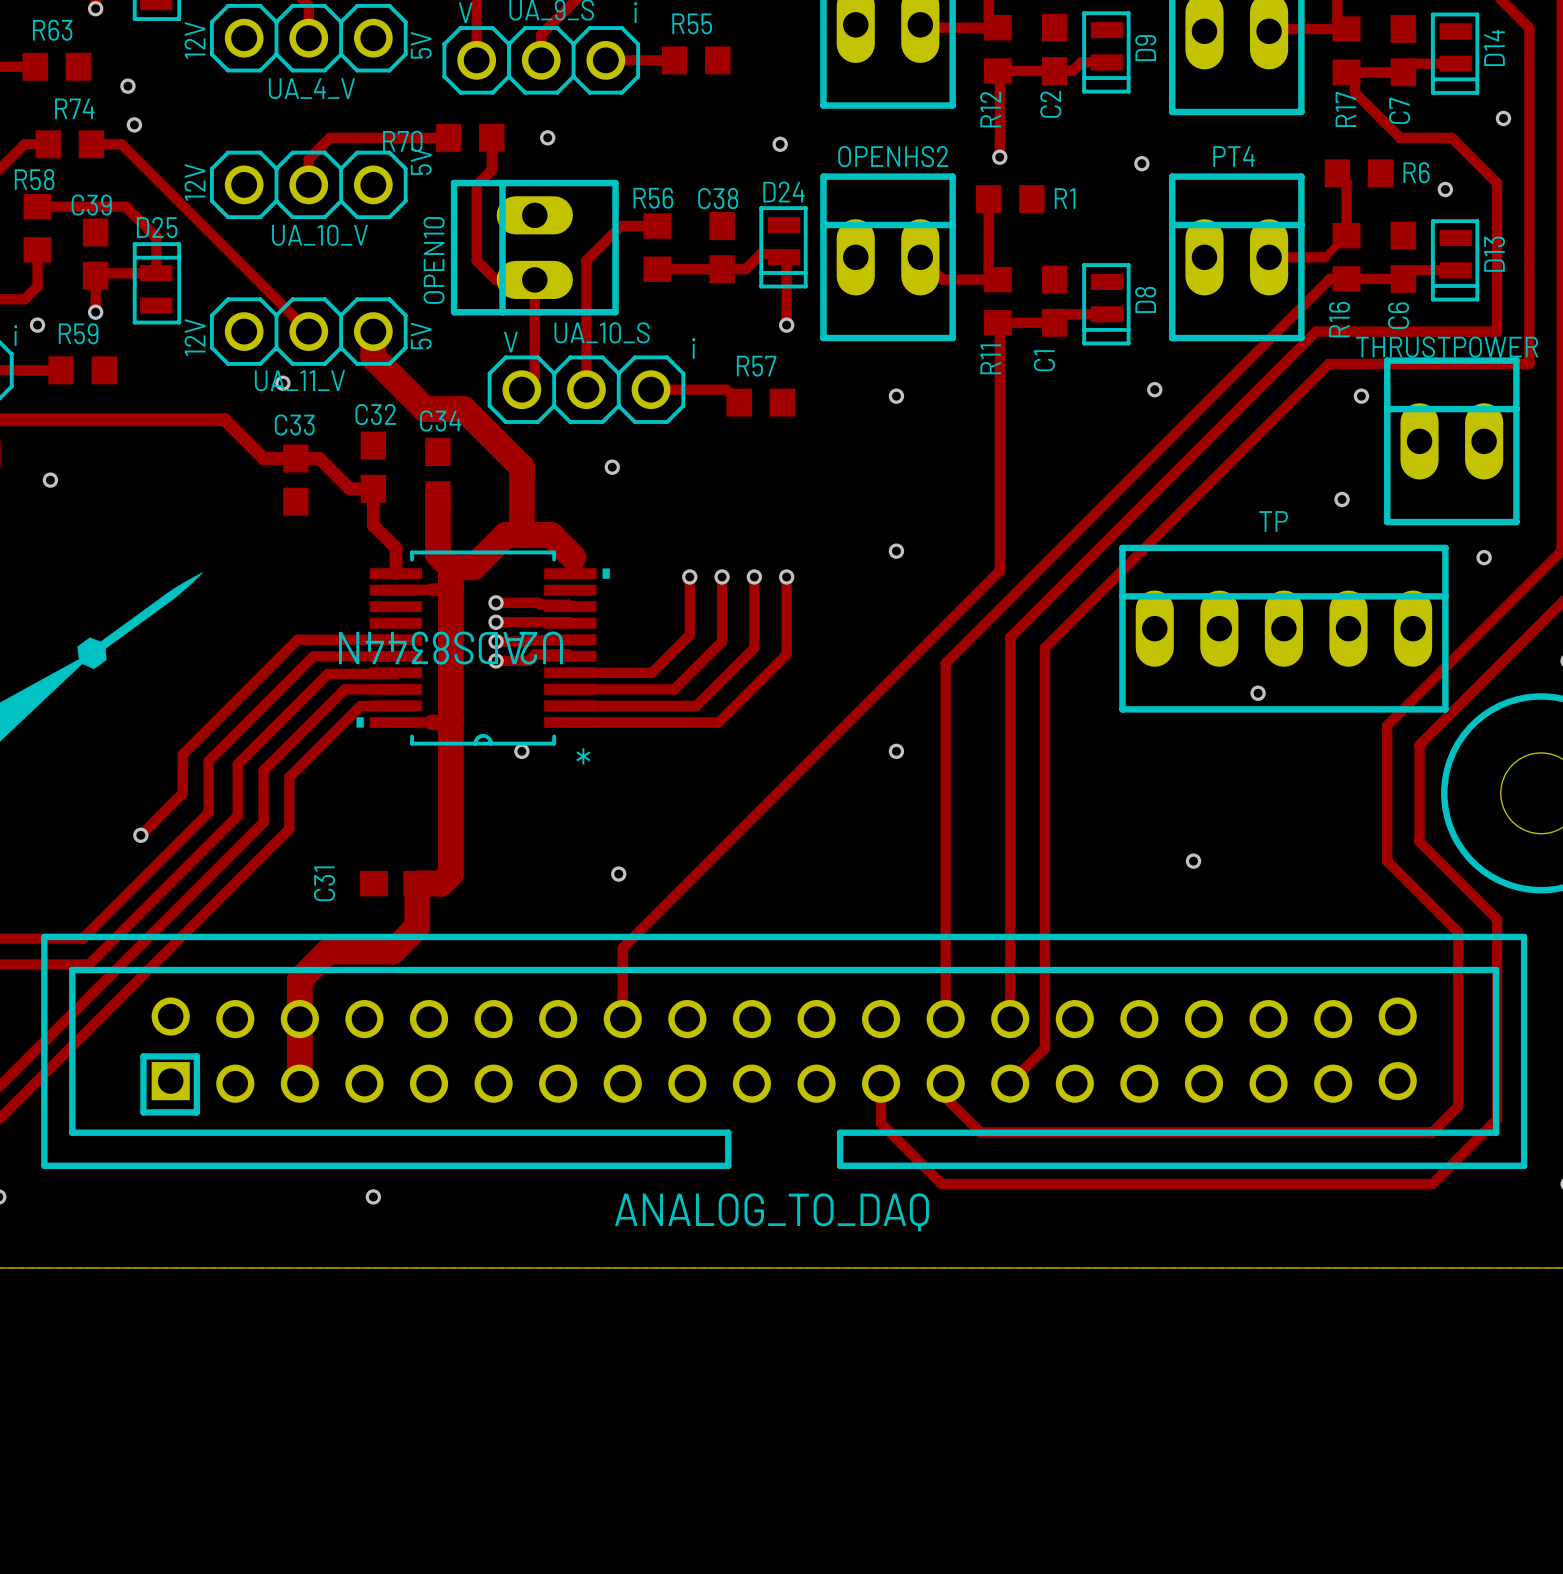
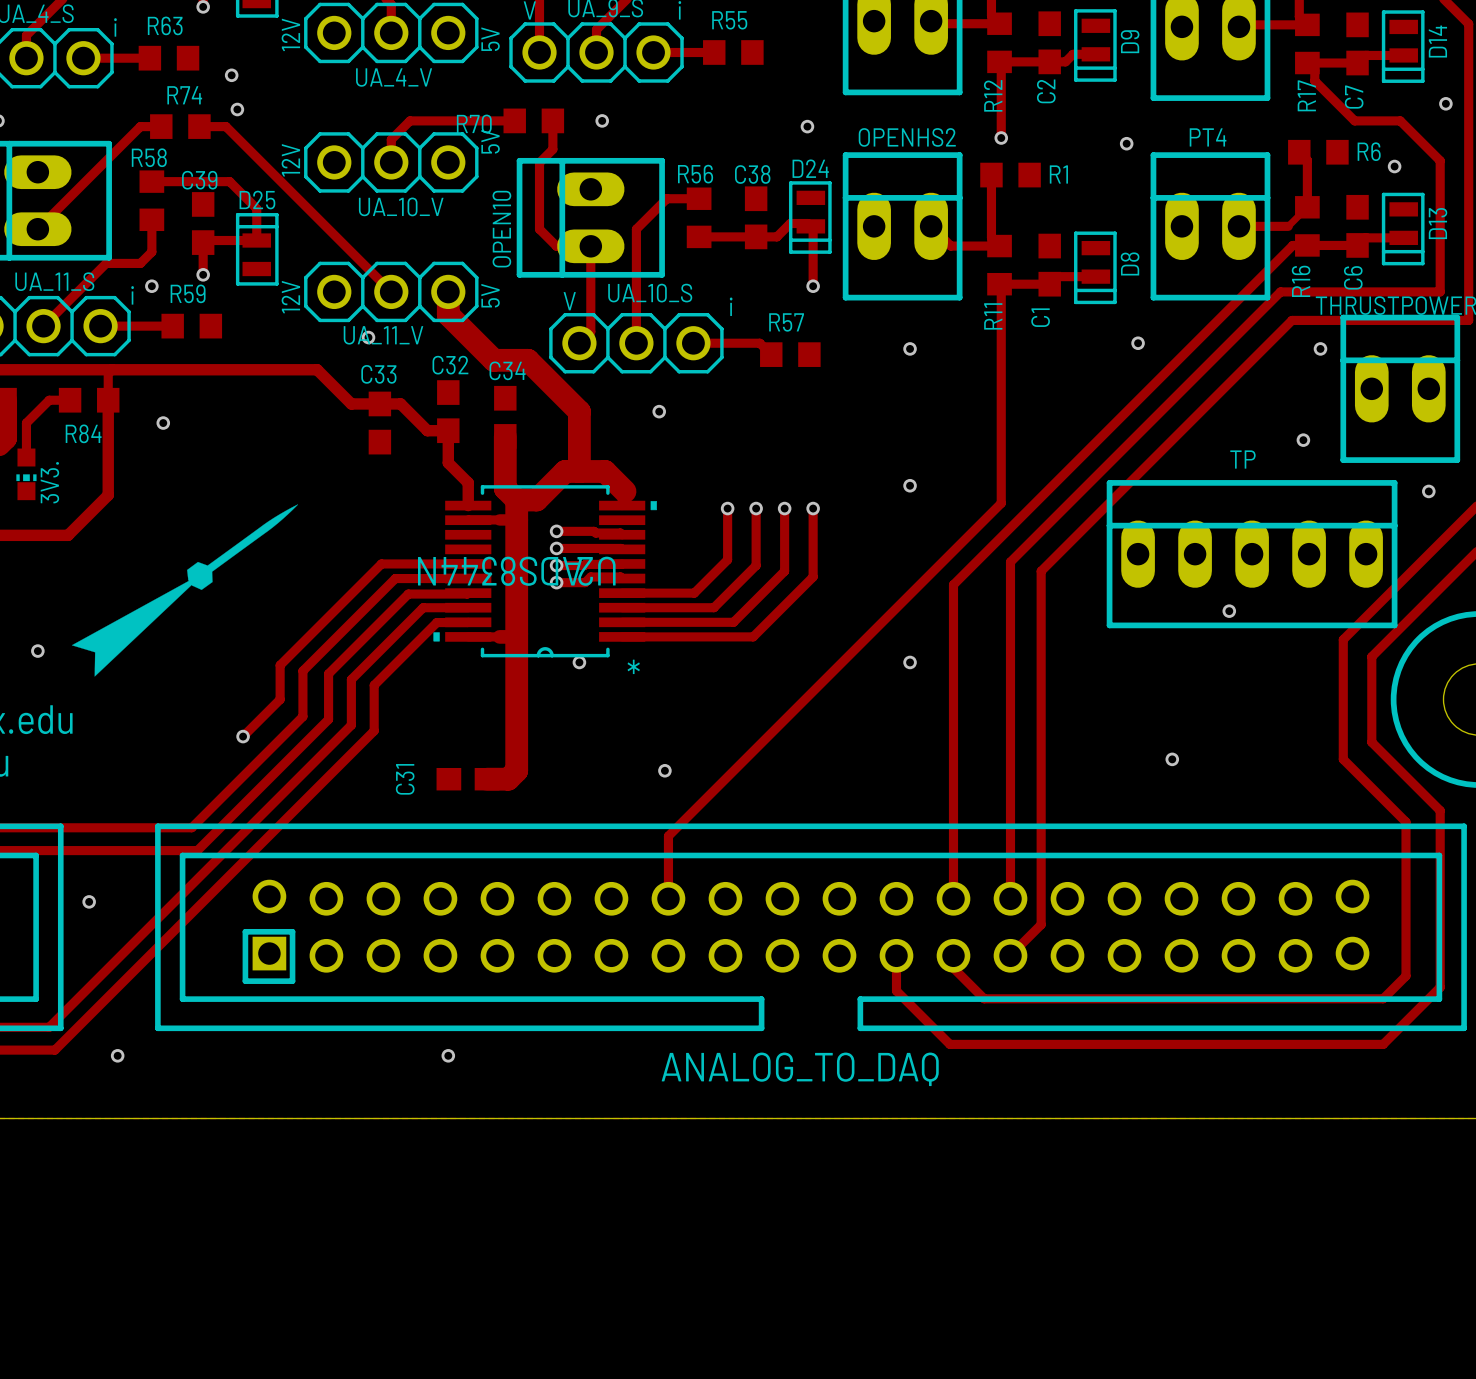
track: (417, 883) (417, 927) (392, 951) (328, 951) (299, 979) (299, 1083) -> none

